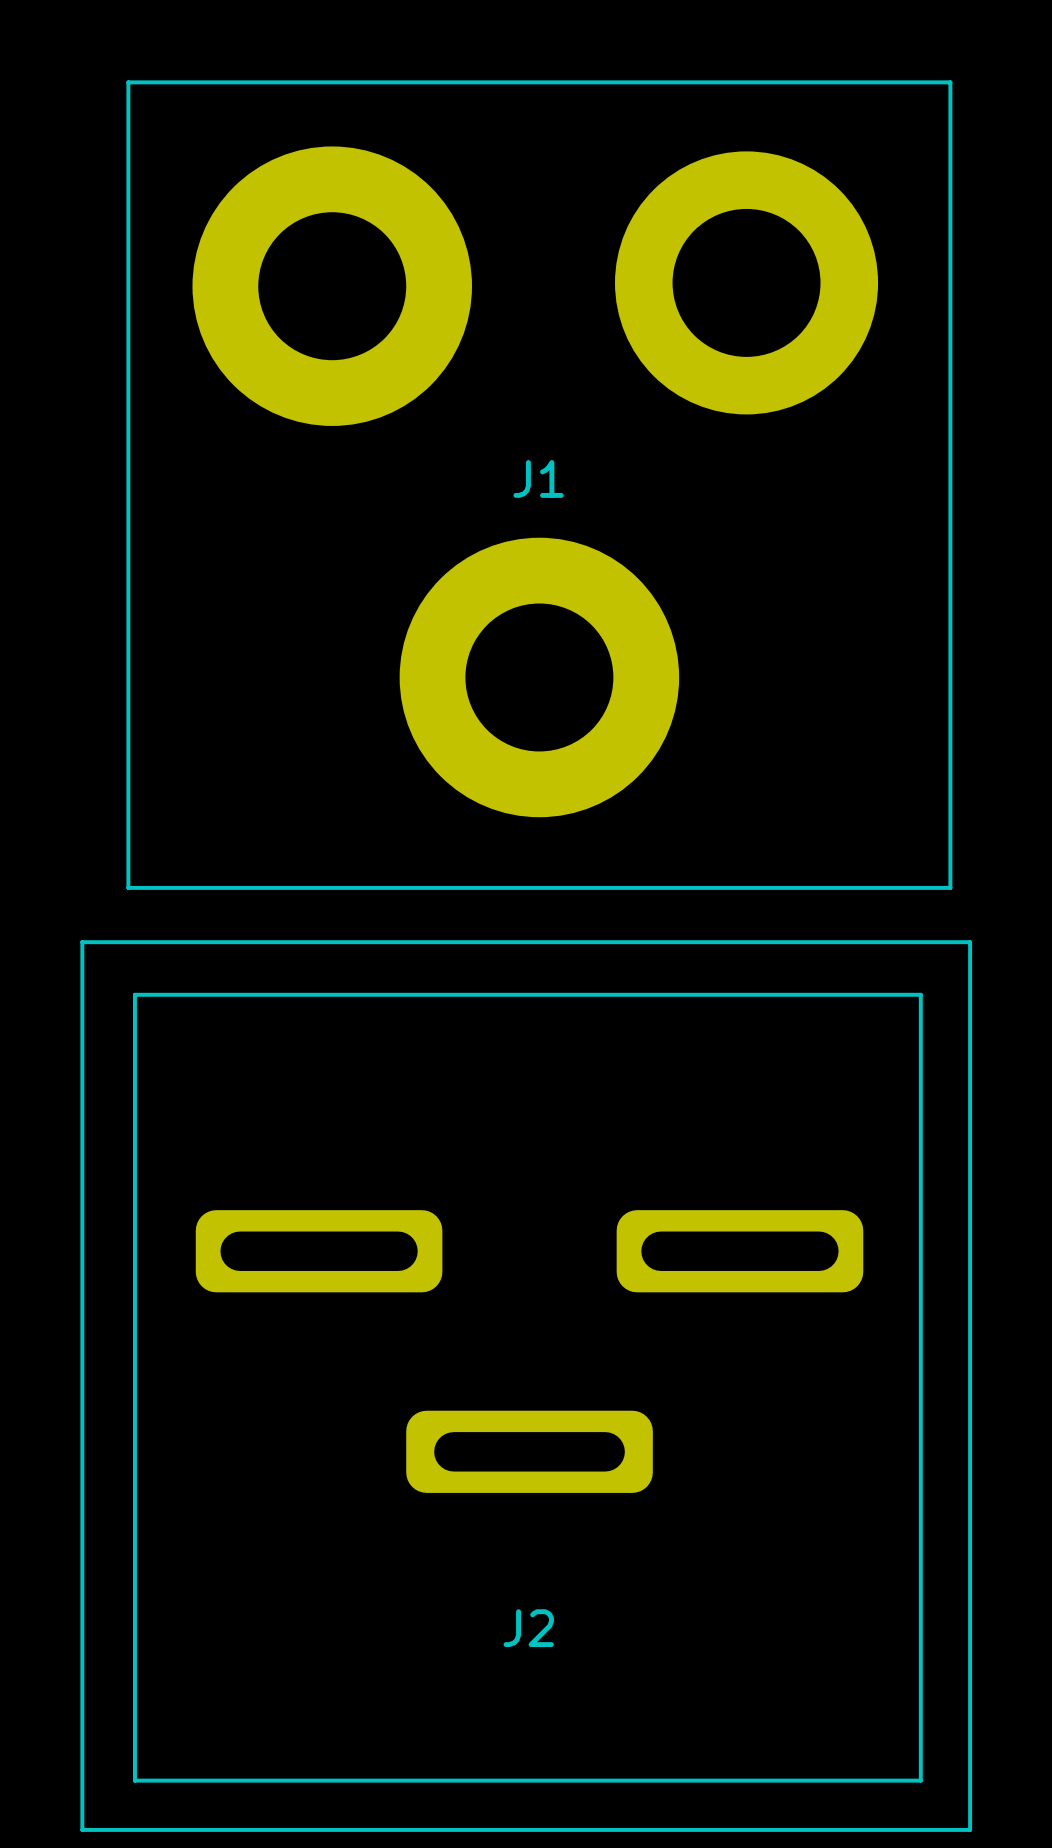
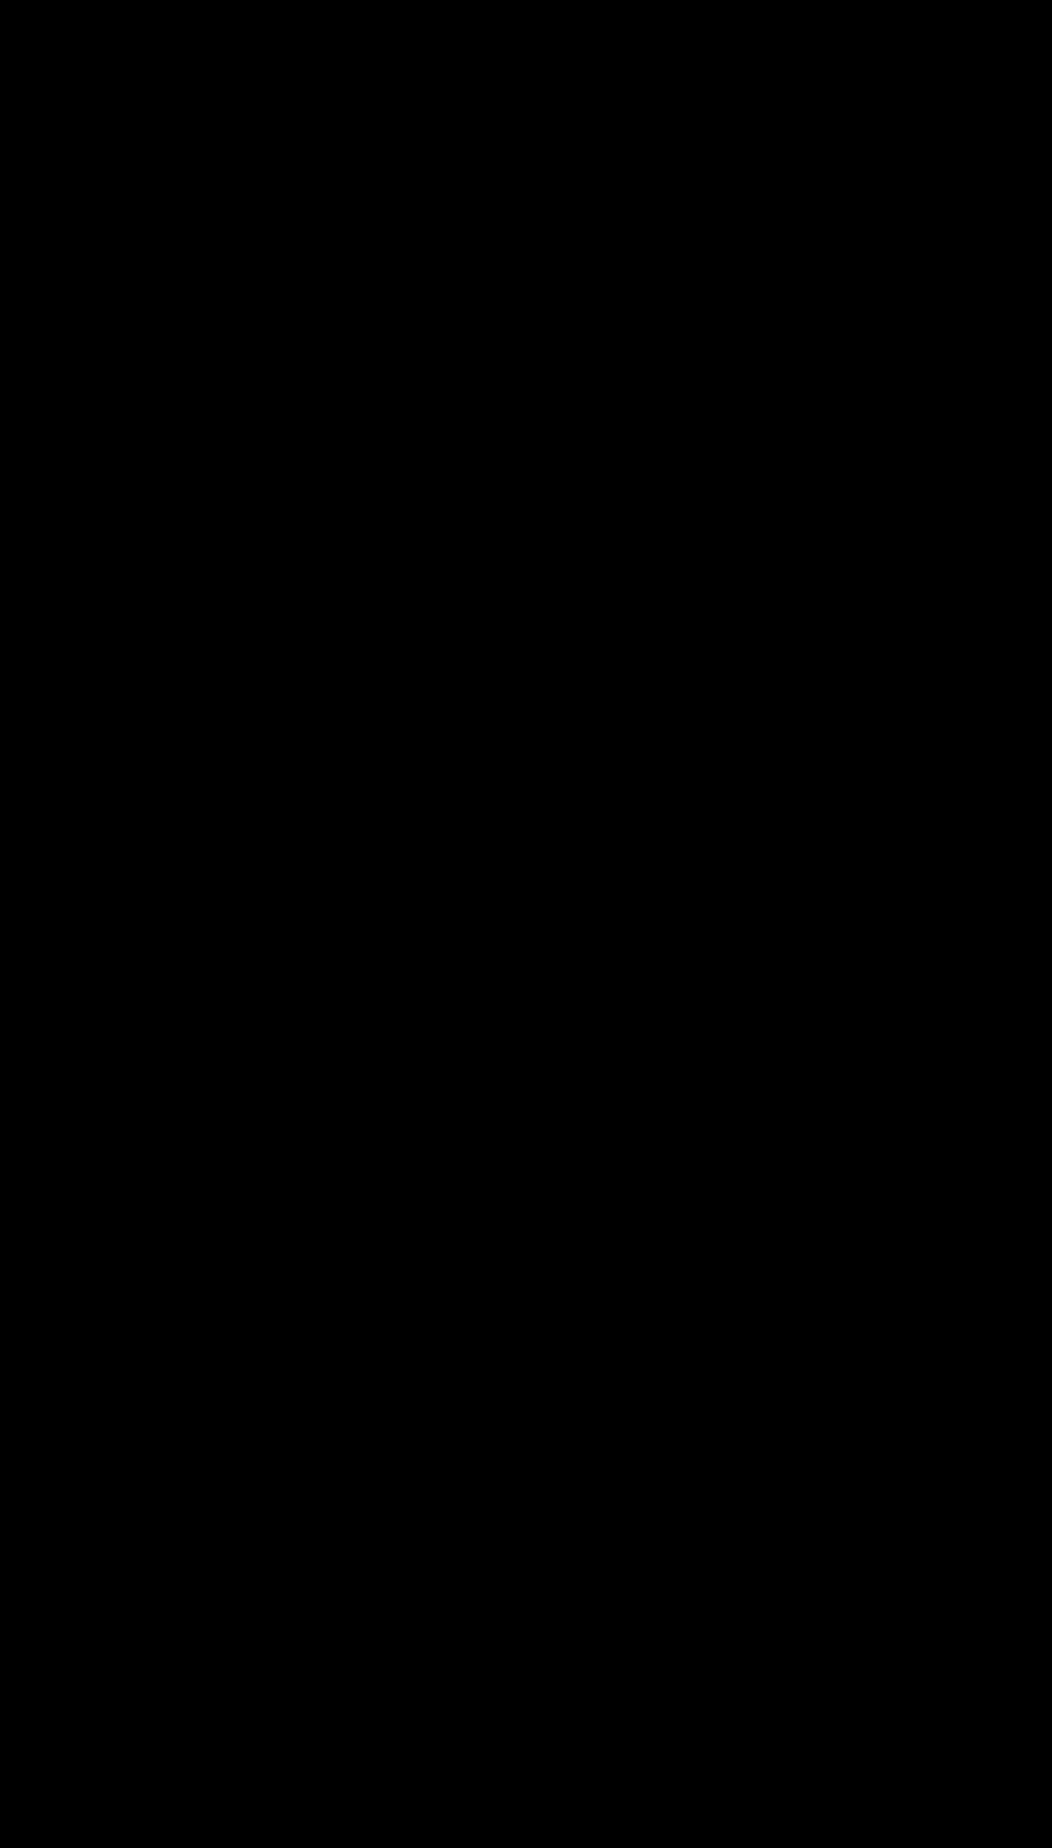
J1: (539, 485) -> none
J2: (526, 1386) -> none

